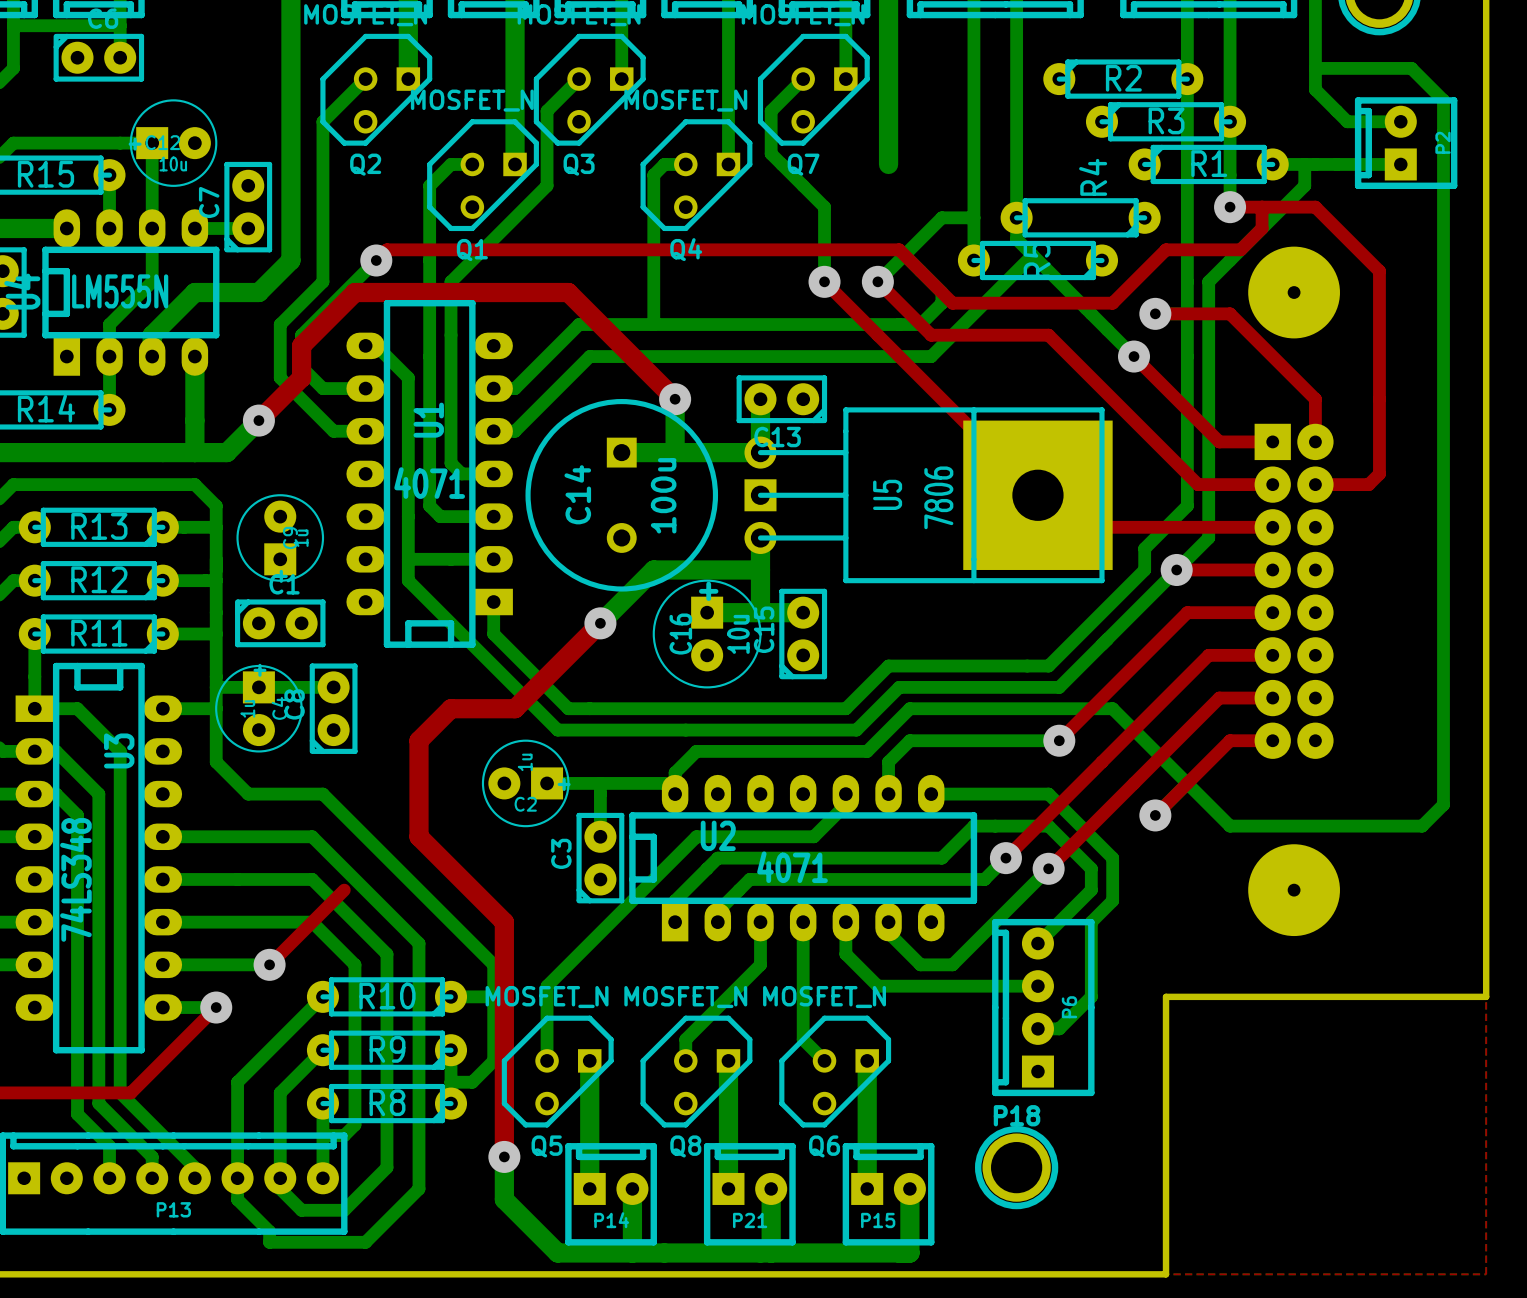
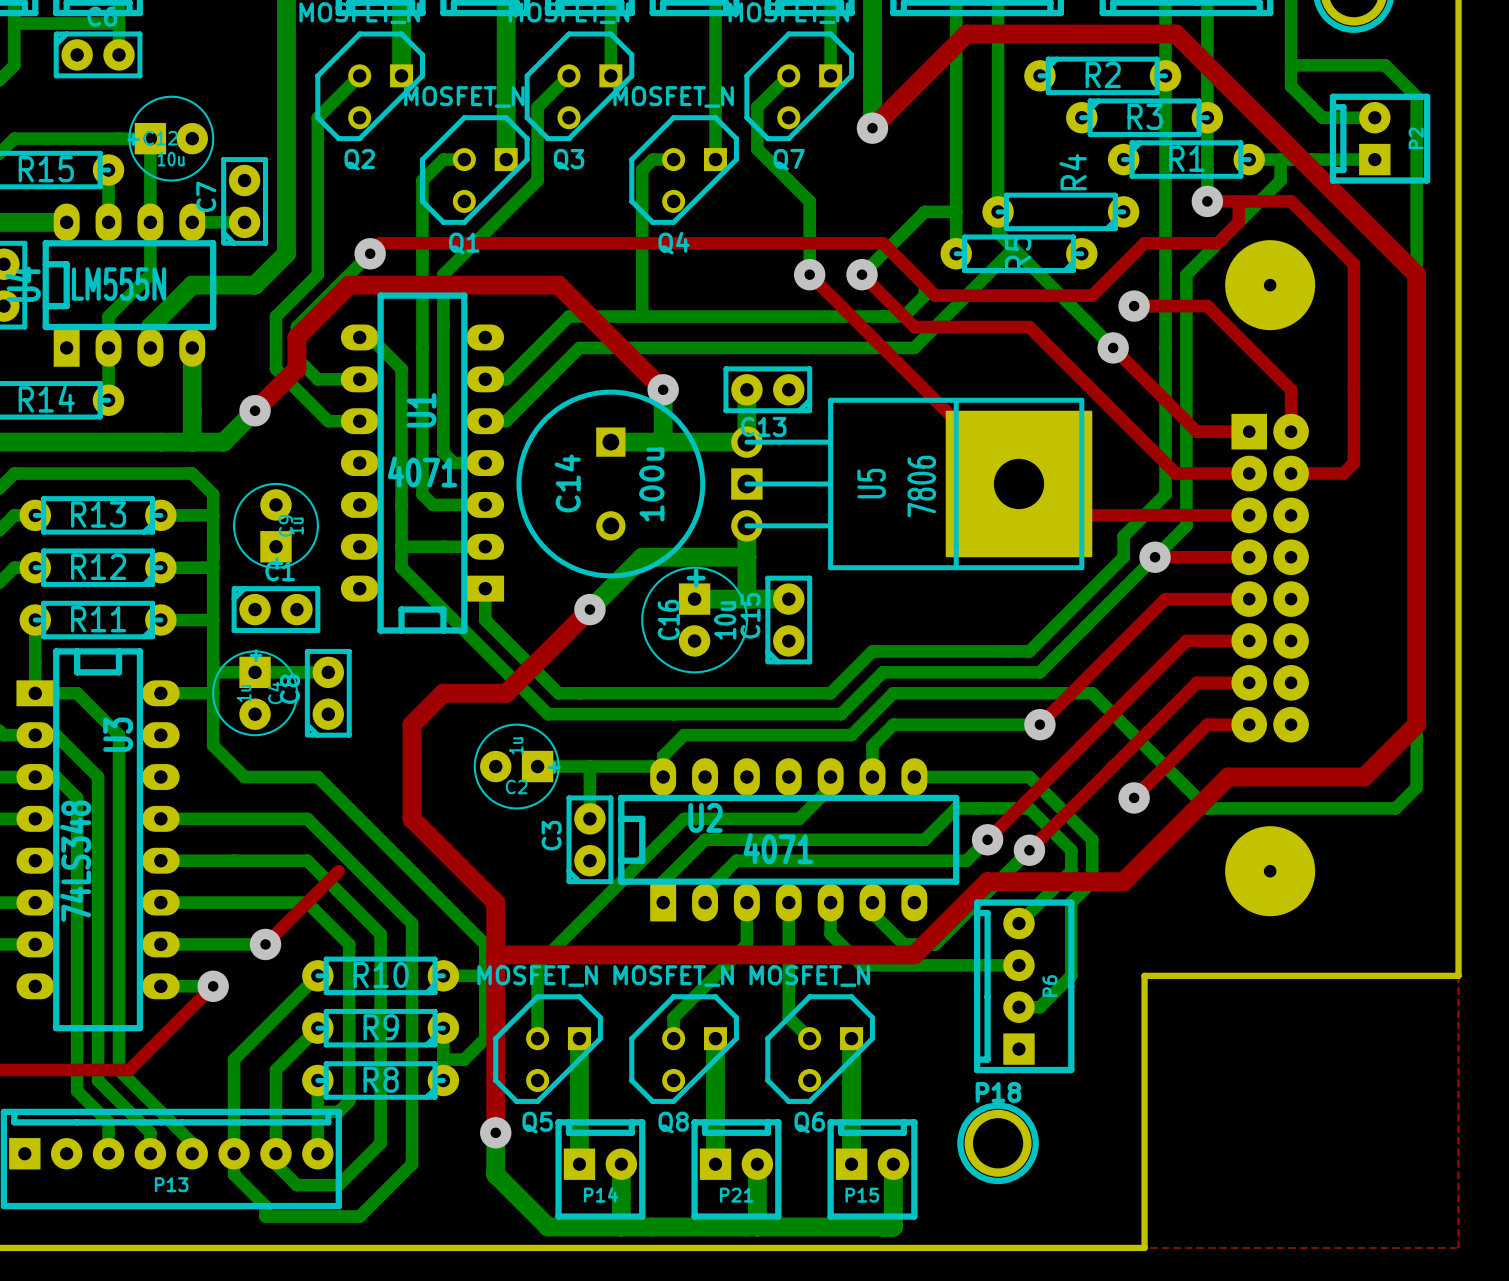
bottom track: (888, 132) (888, 164) -> none
top track: none -> (872, 128) (966, 33) (1175, 33) (1416, 274) (1416, 724) (1364, 777) (1228, 777) (1123, 881) (987, 881) (914, 954) (495, 954)
via: none -> (872, 128)

